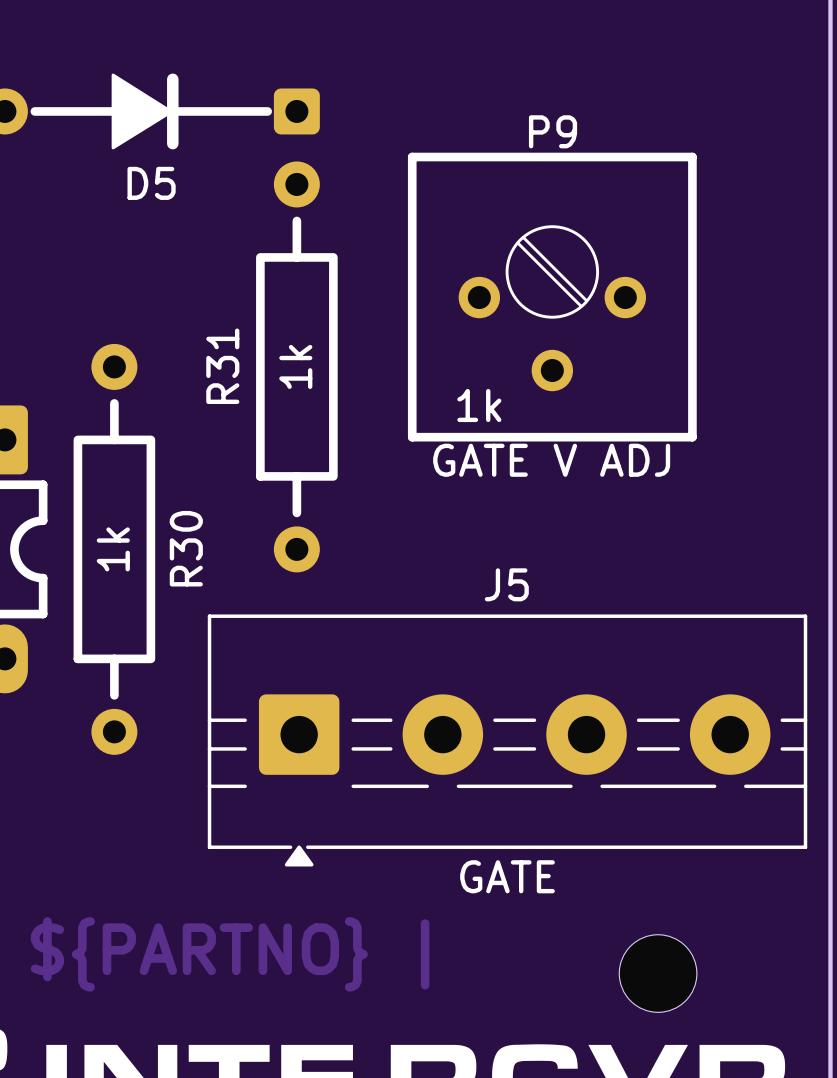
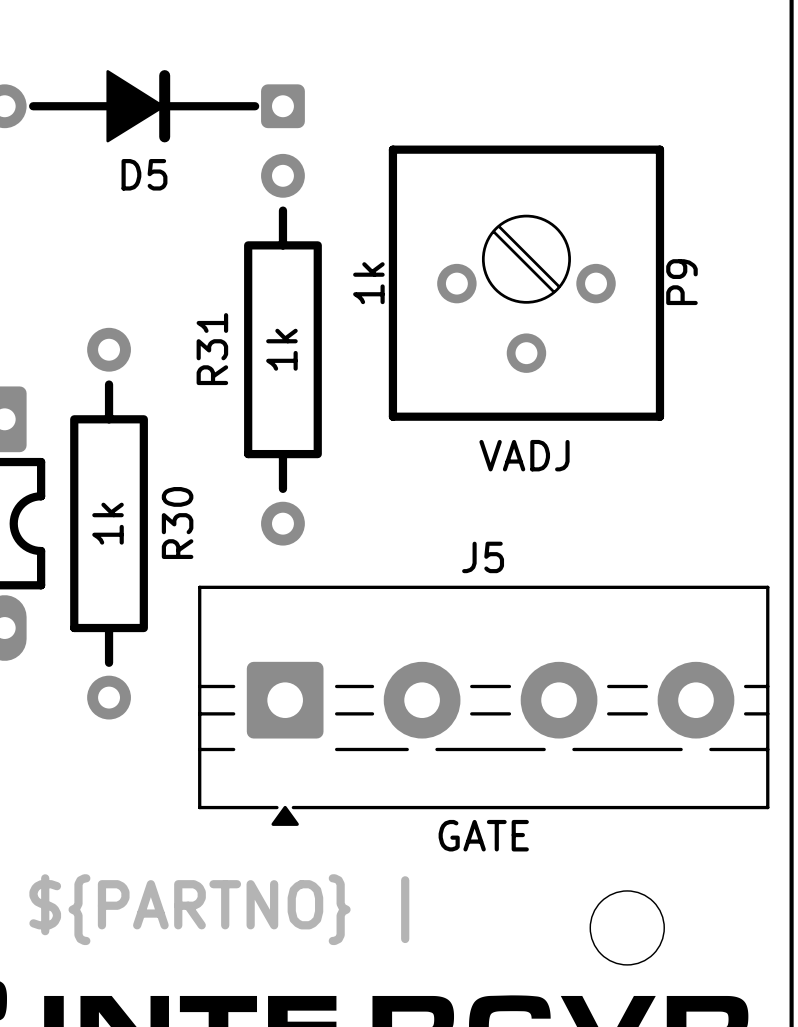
P9 name rotation: 0° (553, 131) -> 90° counterclockwise (681, 282)
P9 name position: P9 (553, 131) -> P9 (681, 282)
P9 value rotation: 0° (479, 405) -> 90° counterclockwise (368, 283)
P9 value position: 1k (479, 405) -> 1k (368, 283)
P9 text: GATE V ADJ (551, 460) -> VADJ (524, 455)

